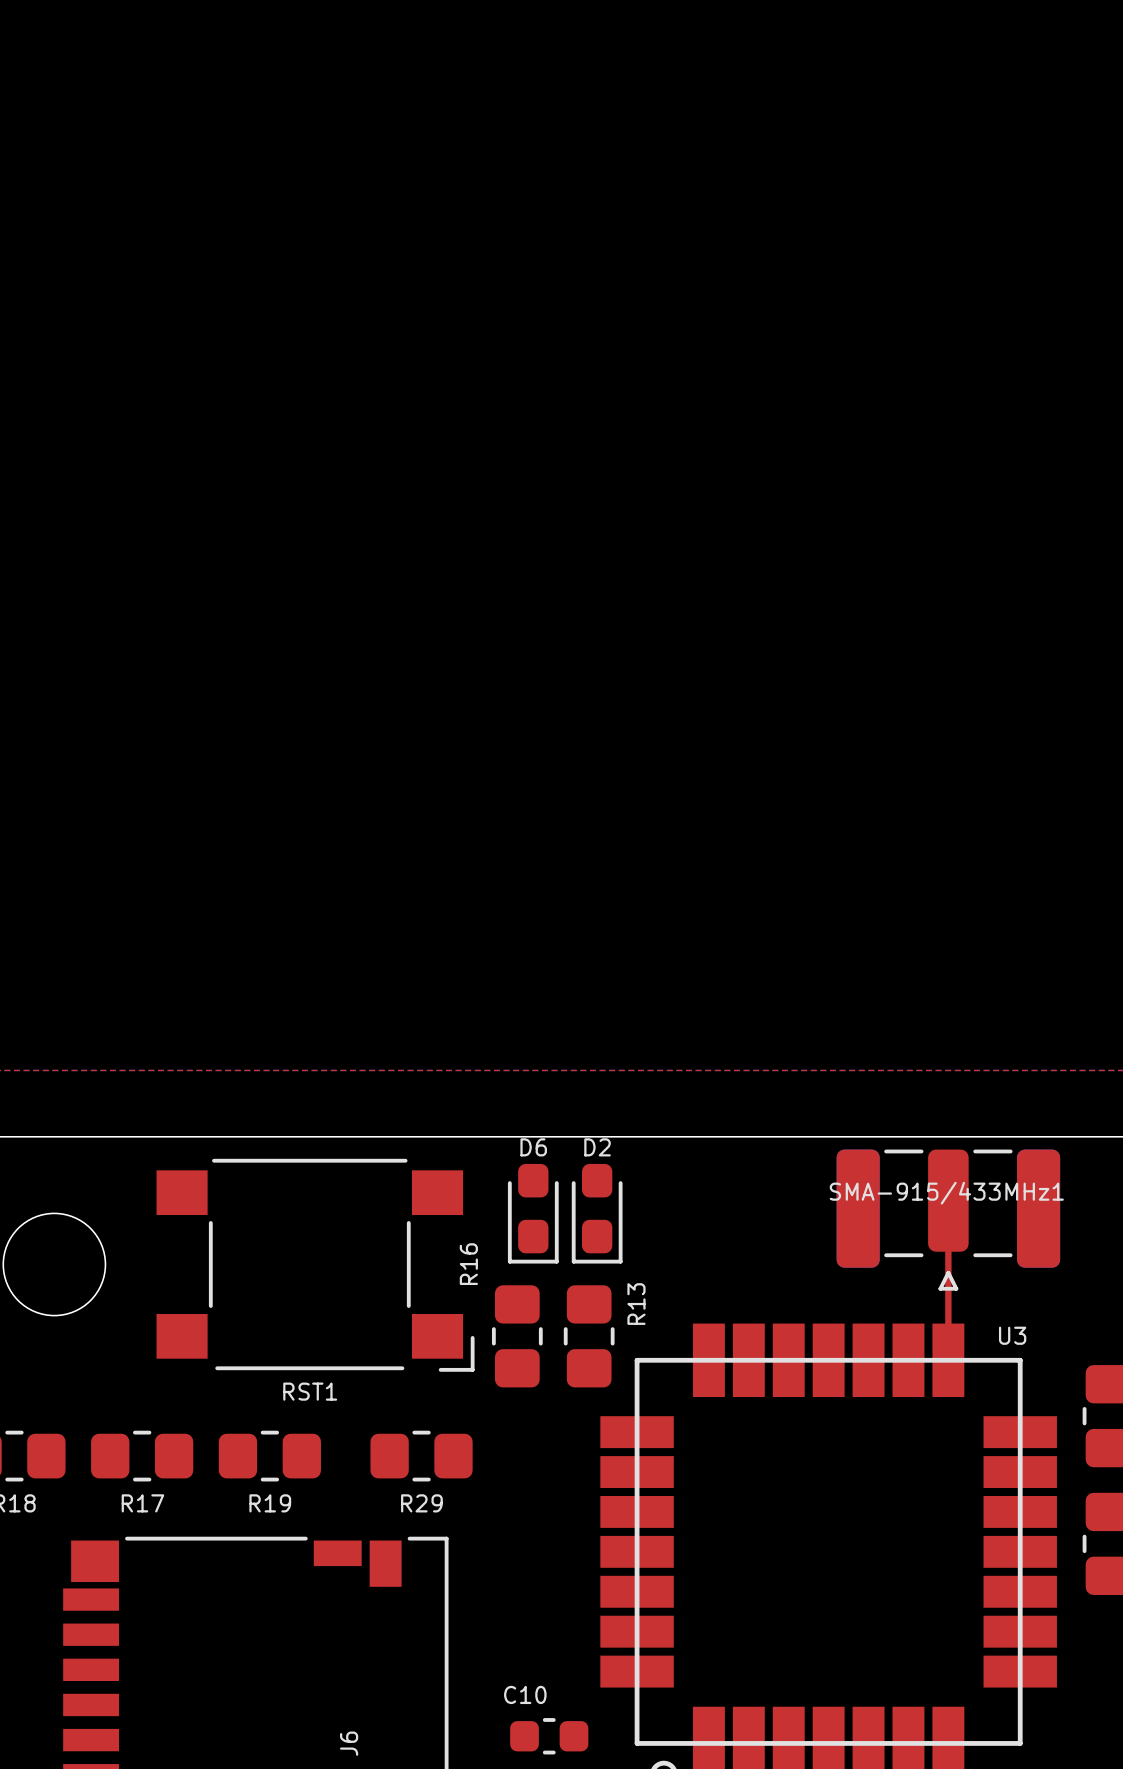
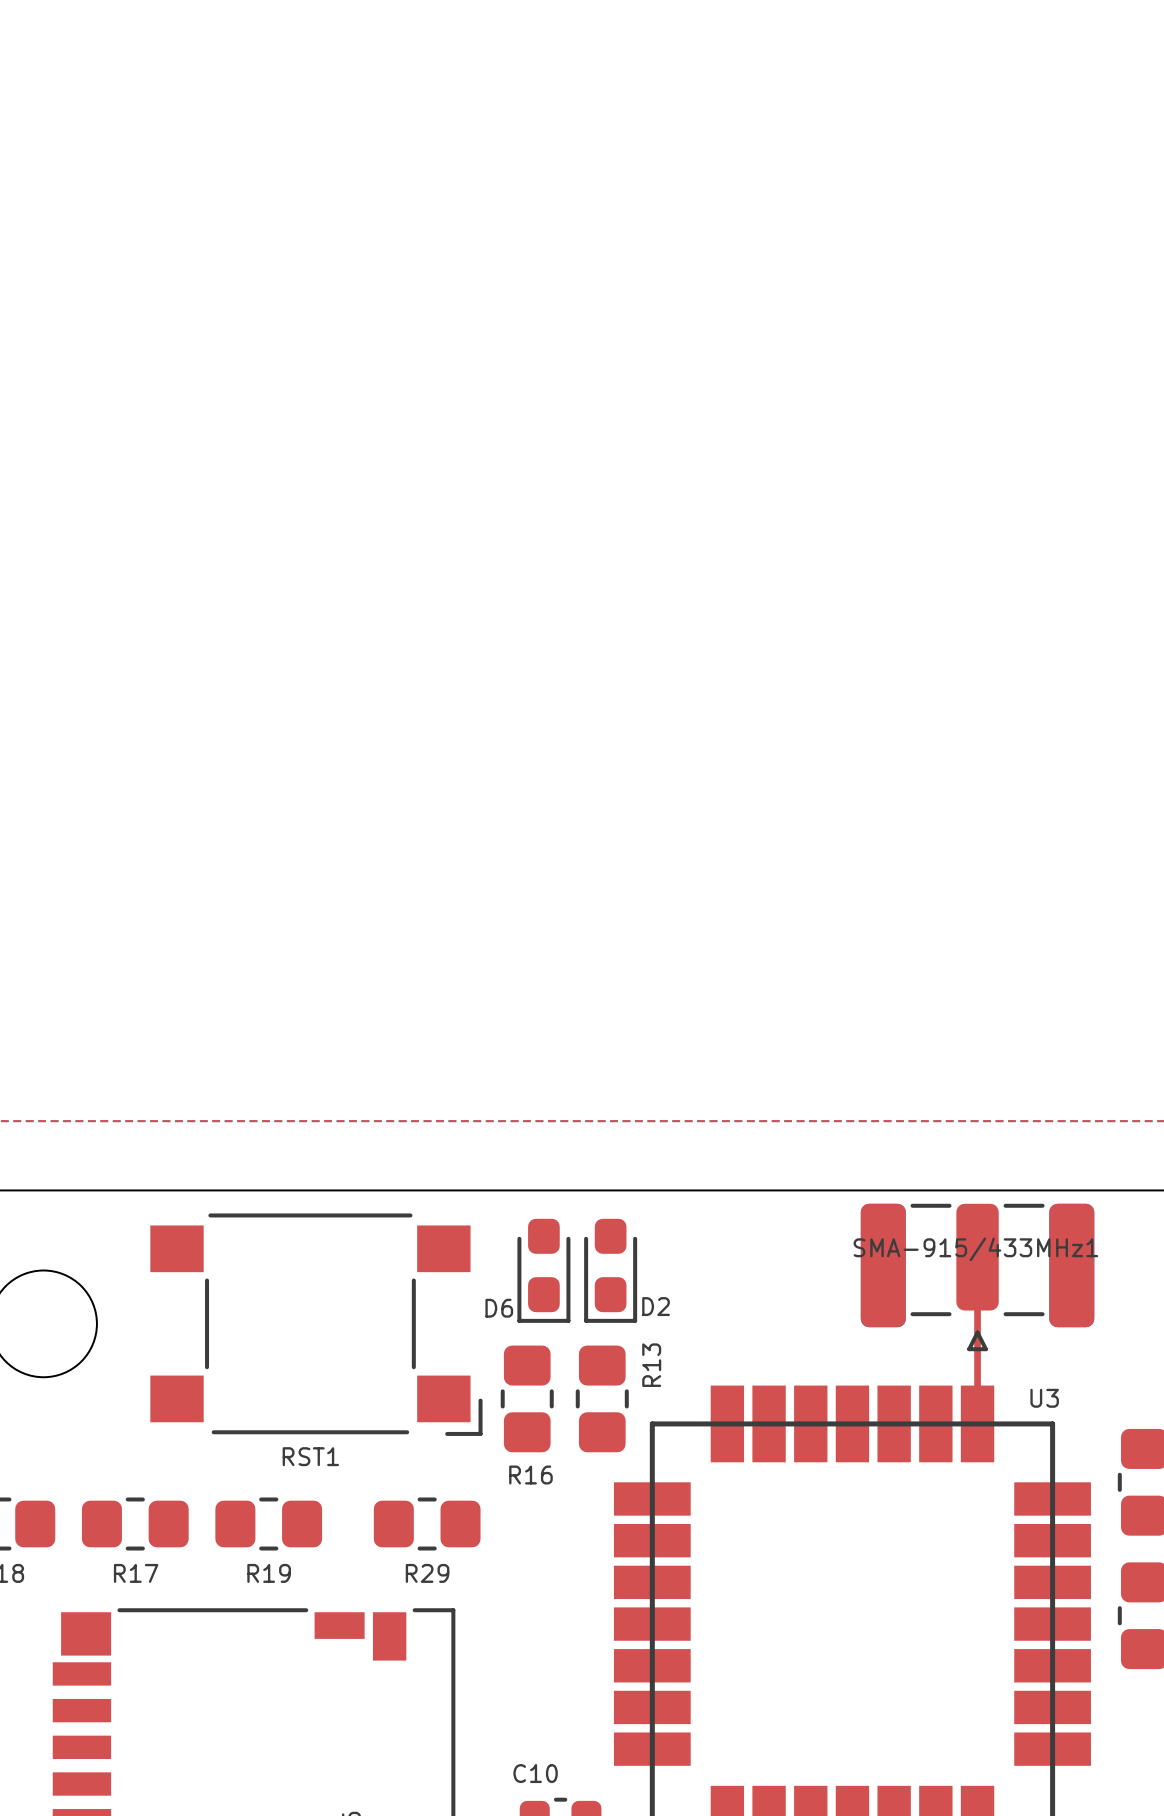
D6 name position: D6 (533, 1147) -> D6 (499, 1308)
D2 name position: D2 (597, 1147) -> D2 (656, 1306)
R16 name rotation: 0° (468, 1264) -> 90° clockwise (530, 1475)
R16 name position: R16 (468, 1264) -> R16 (530, 1475)

